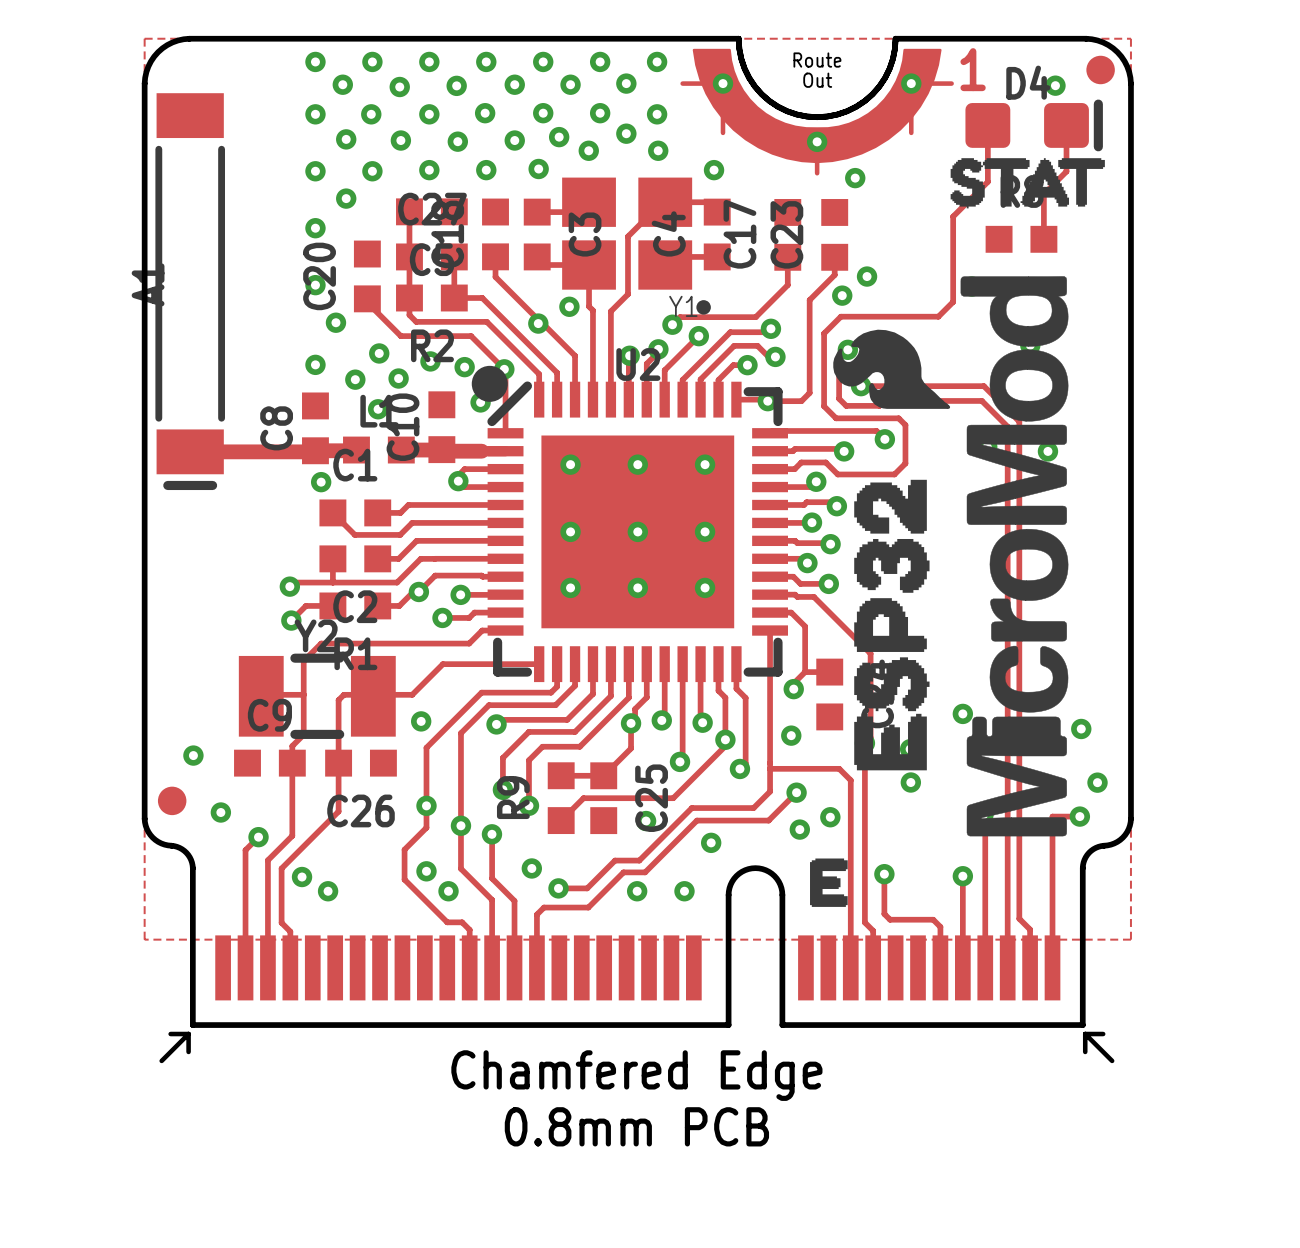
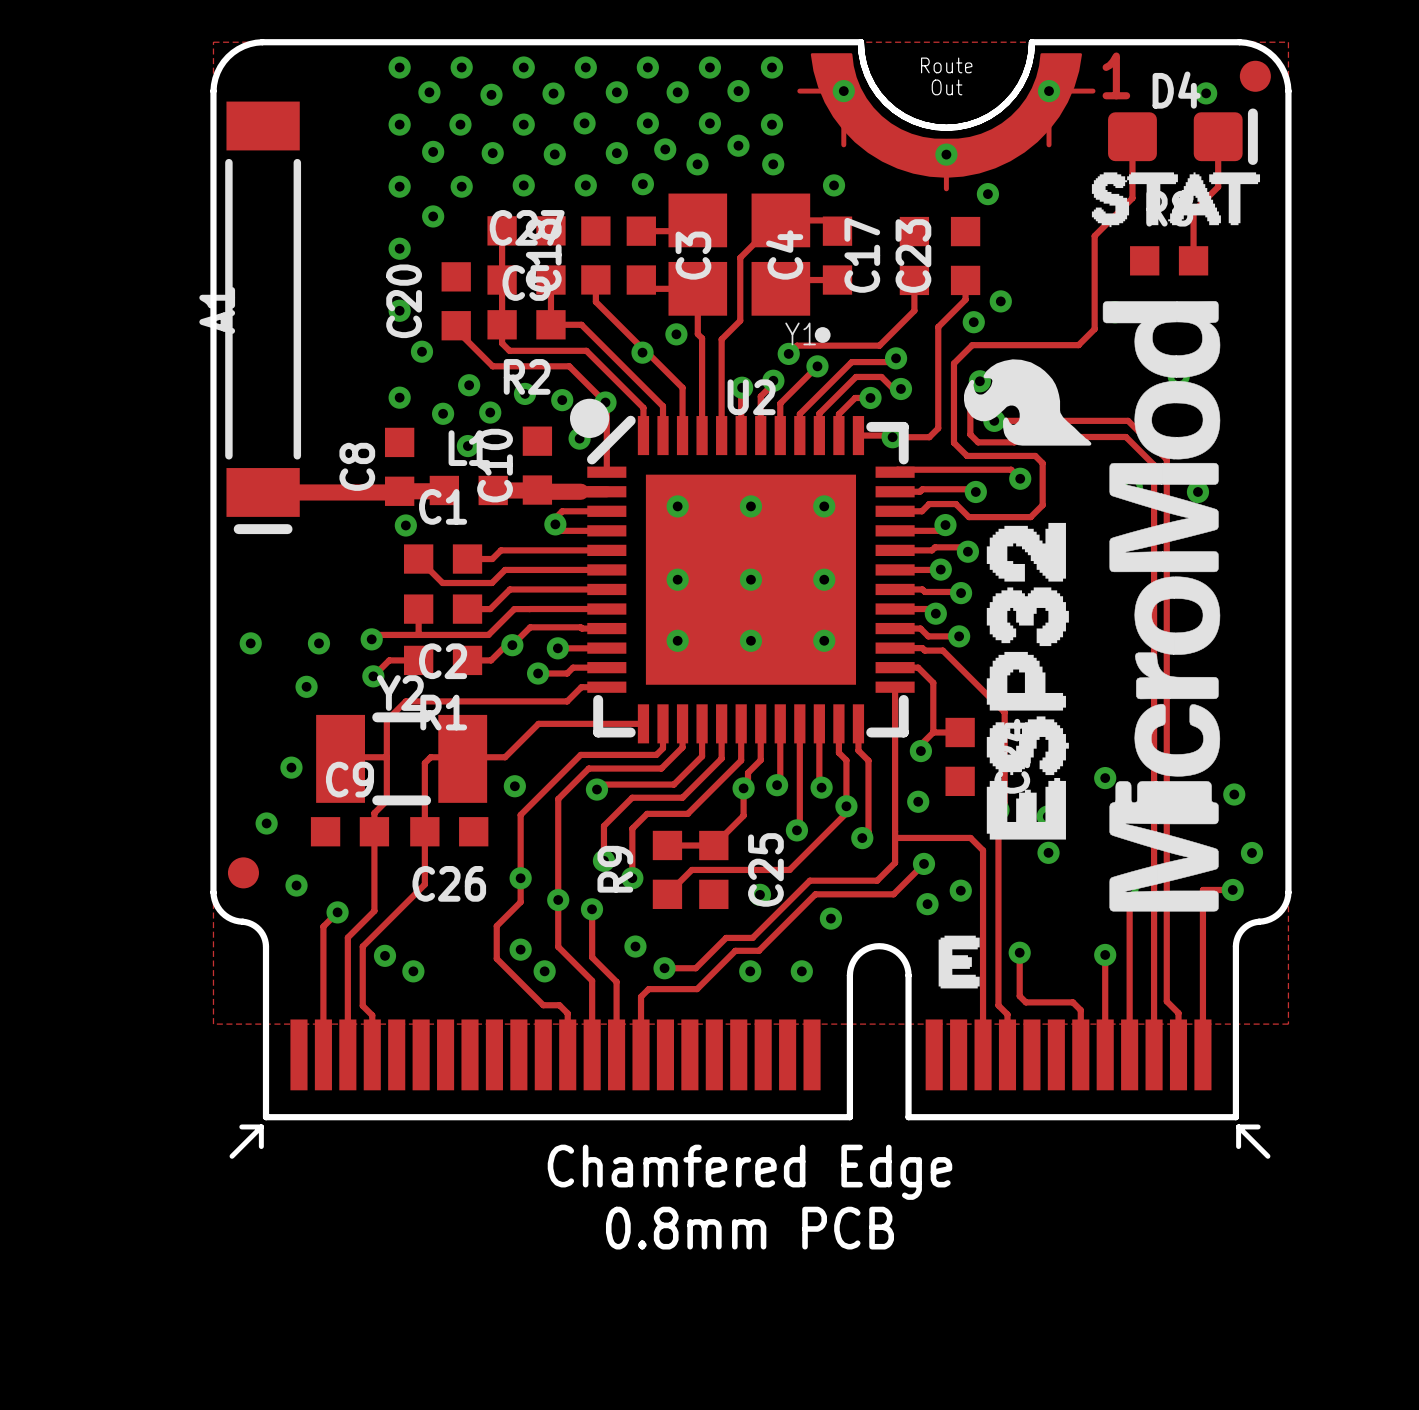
via: none -> (250, 643)
via: none -> (318, 643)
via: none -> (306, 686)
via: none -> (291, 767)

